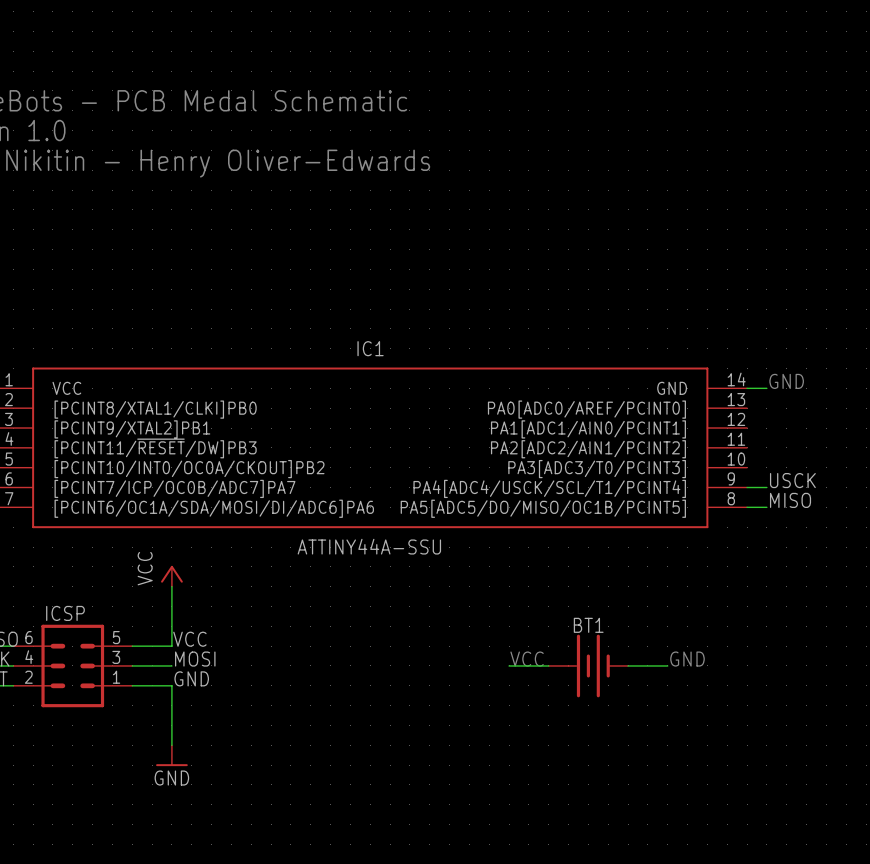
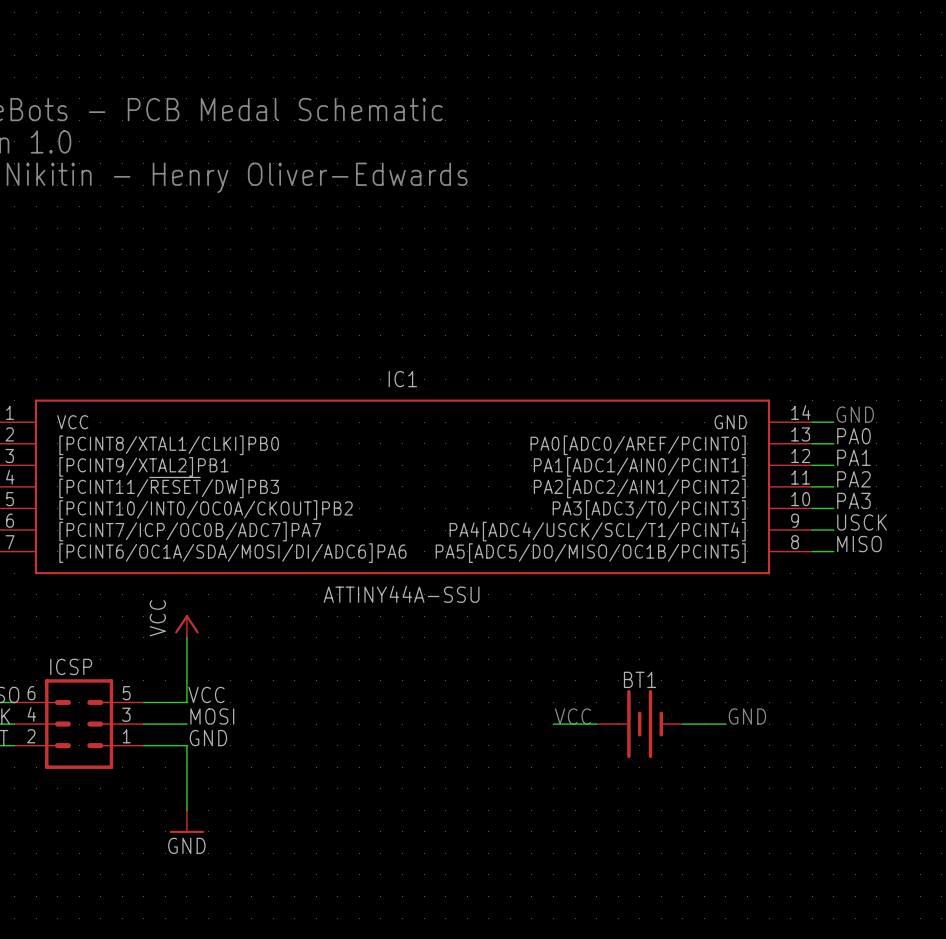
text: none -> PA0 (853, 436)
wire: none -> (812, 443) (833, 443)
text: none -> PA1 (853, 457)
wire: none -> (812, 465) (833, 465)
text: none -> PA2 (853, 479)
wire: none -> (812, 486) (833, 486)
text: none -> PA3 (853, 500)
wire: none -> (812, 508) (833, 508)

